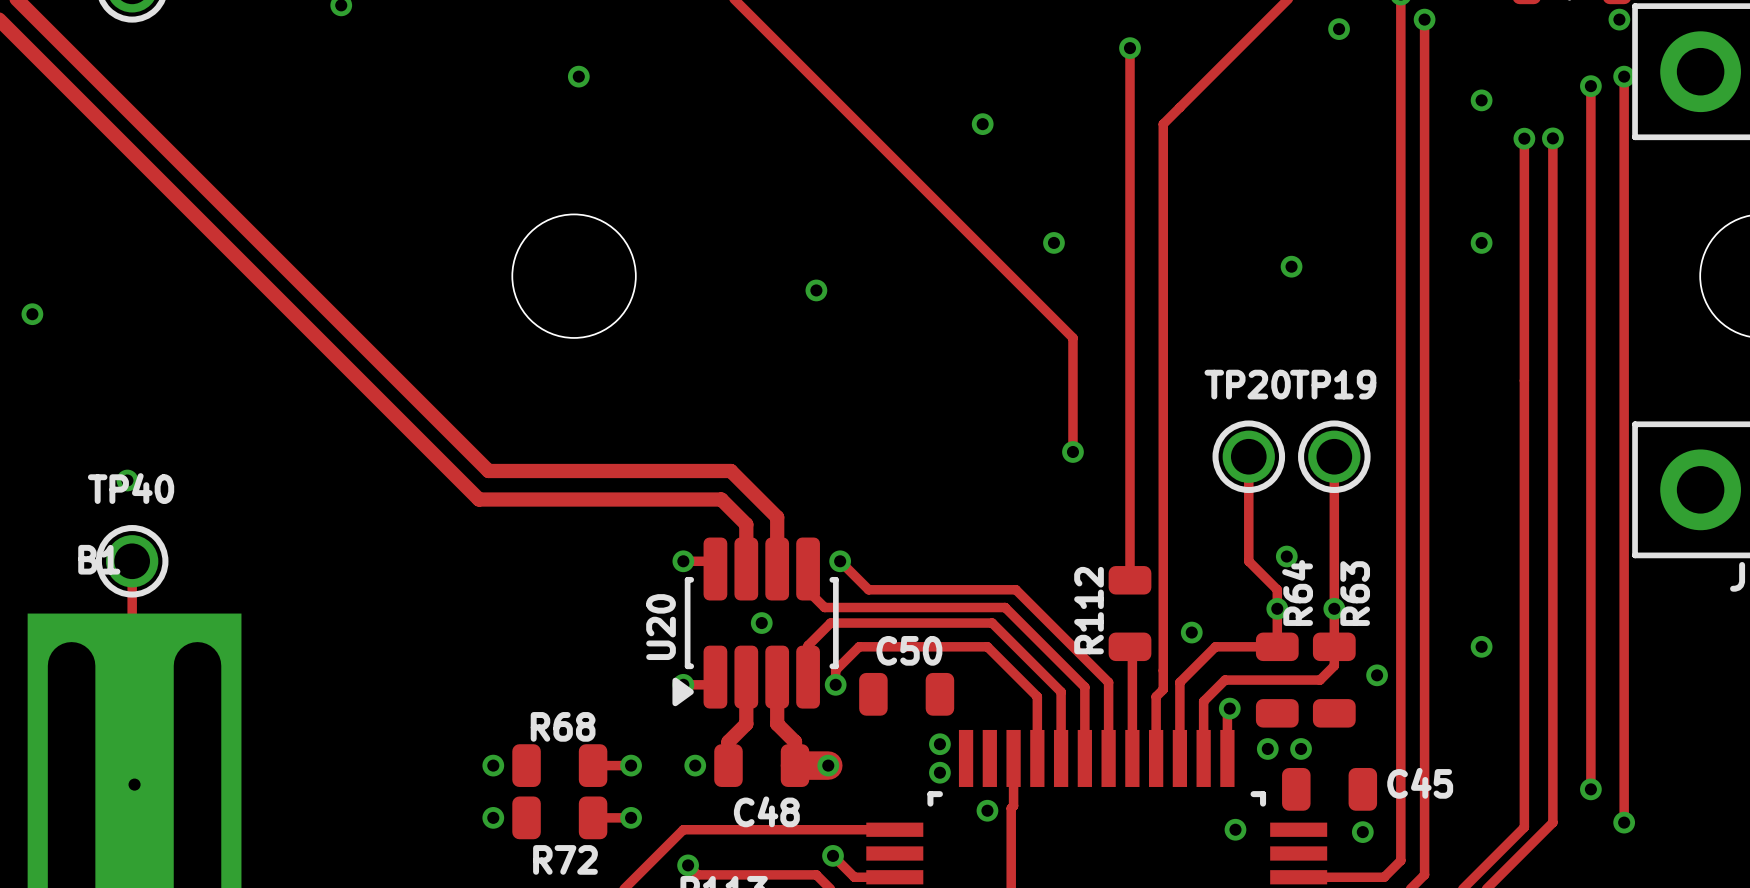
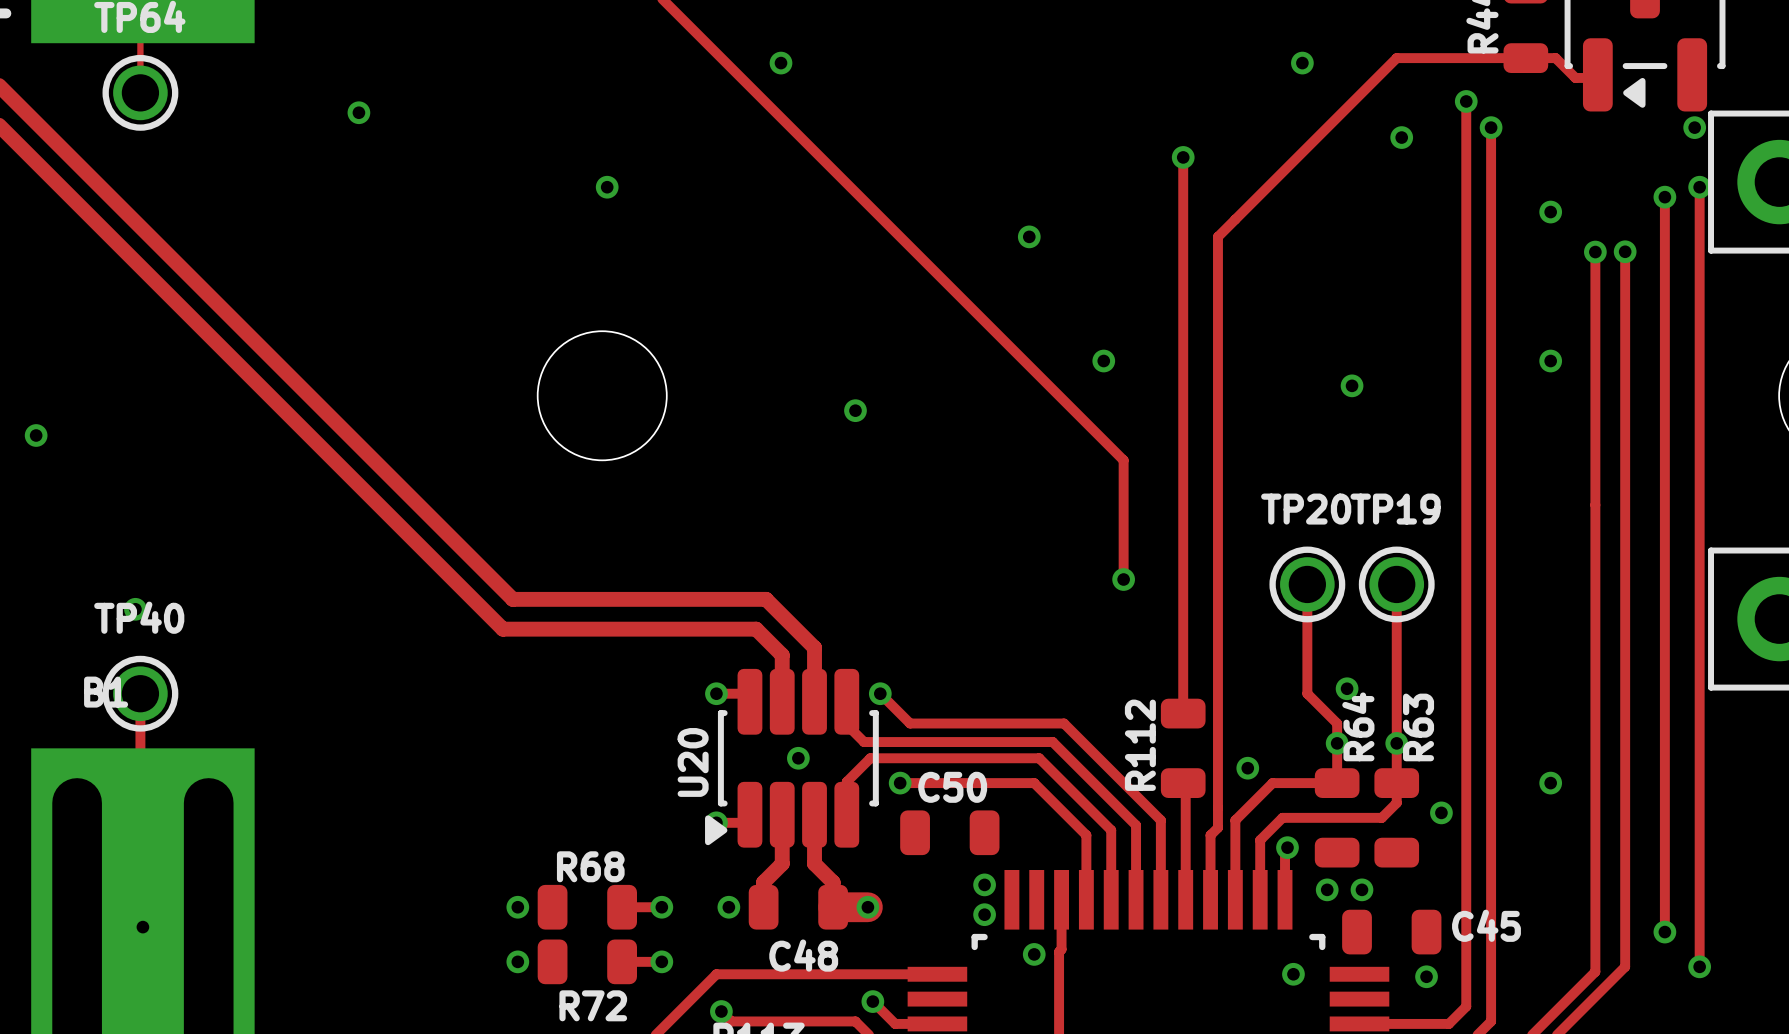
track: (859, 646) (835, 670) (835, 684) -> none
via position: (835, 684) -> (900, 783)

